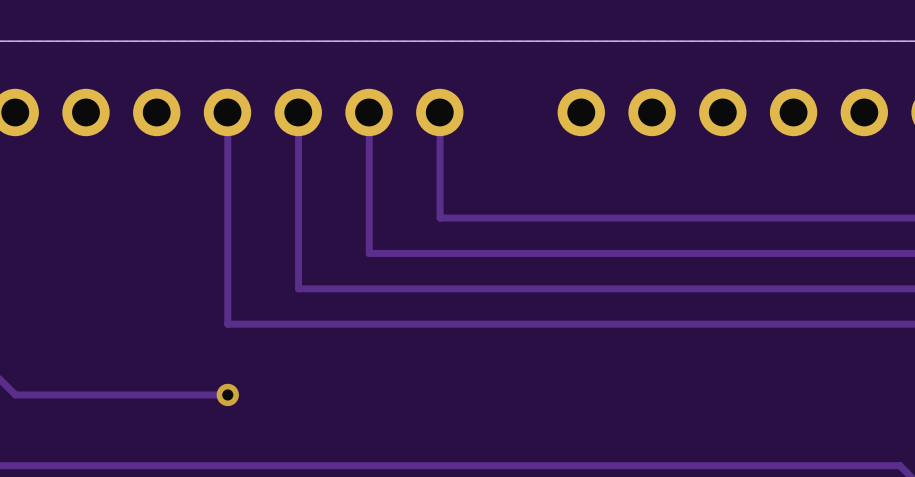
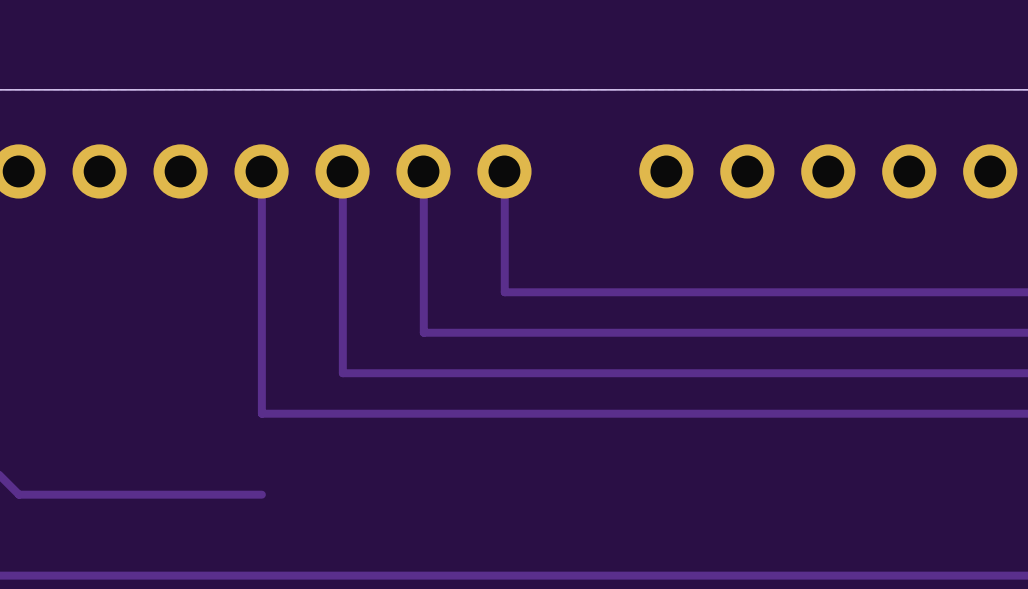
via: (227, 394) -> none

